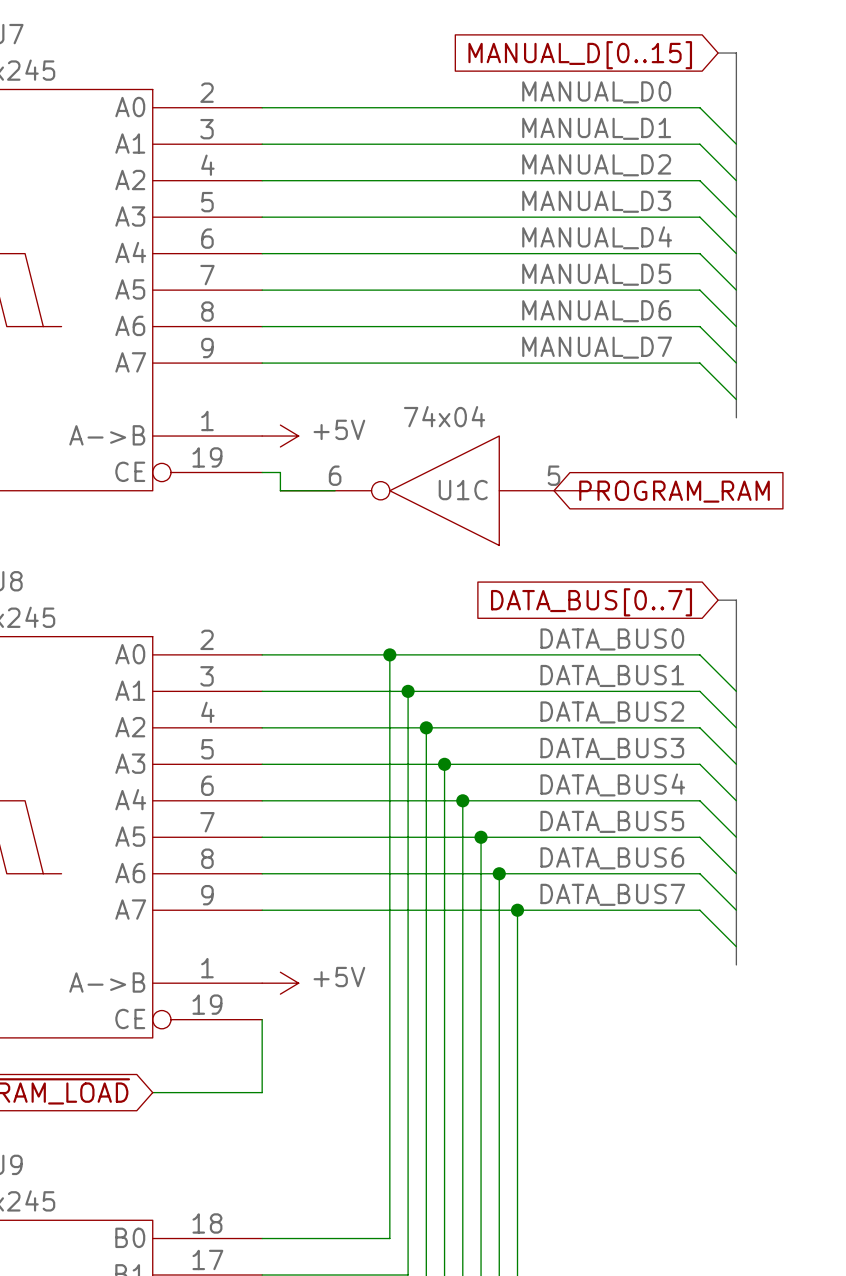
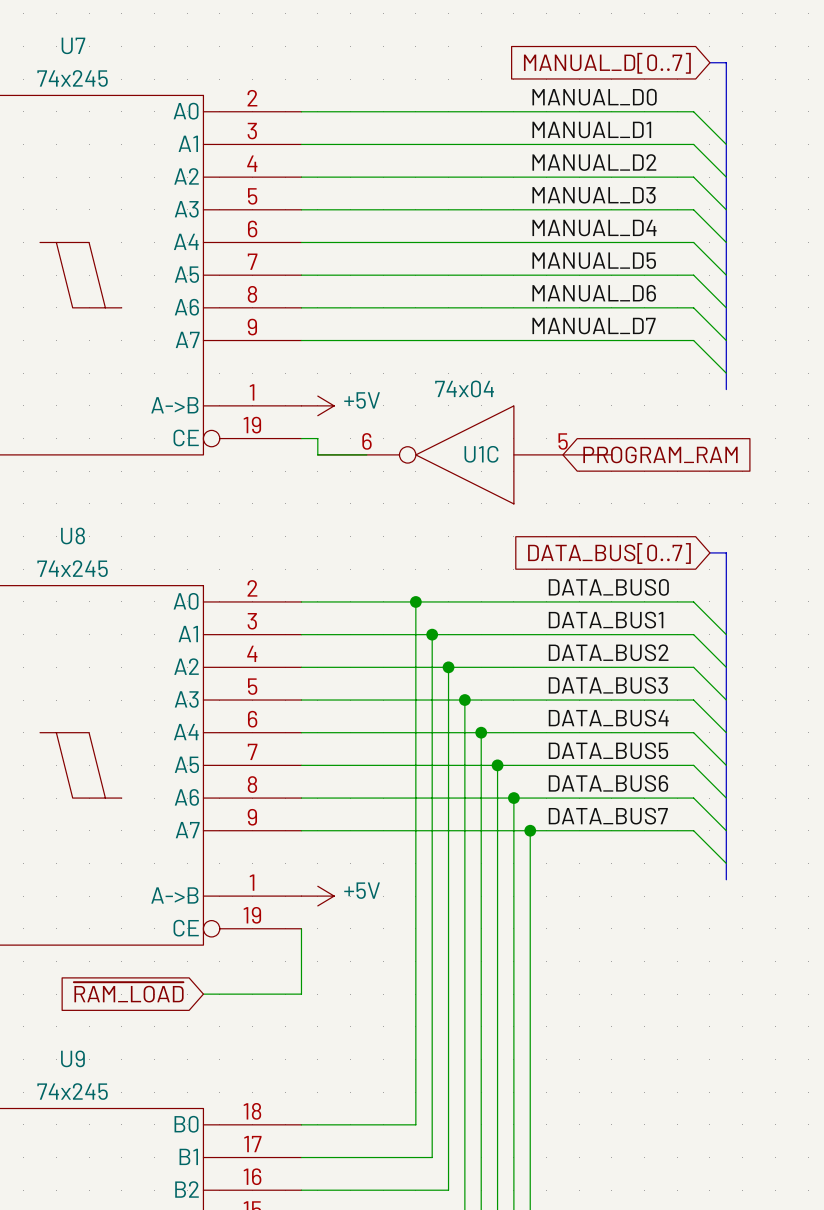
global label: MANUAL_D[0..15] (580, 55) -> MANUAL_D[0..7] (607, 63)

